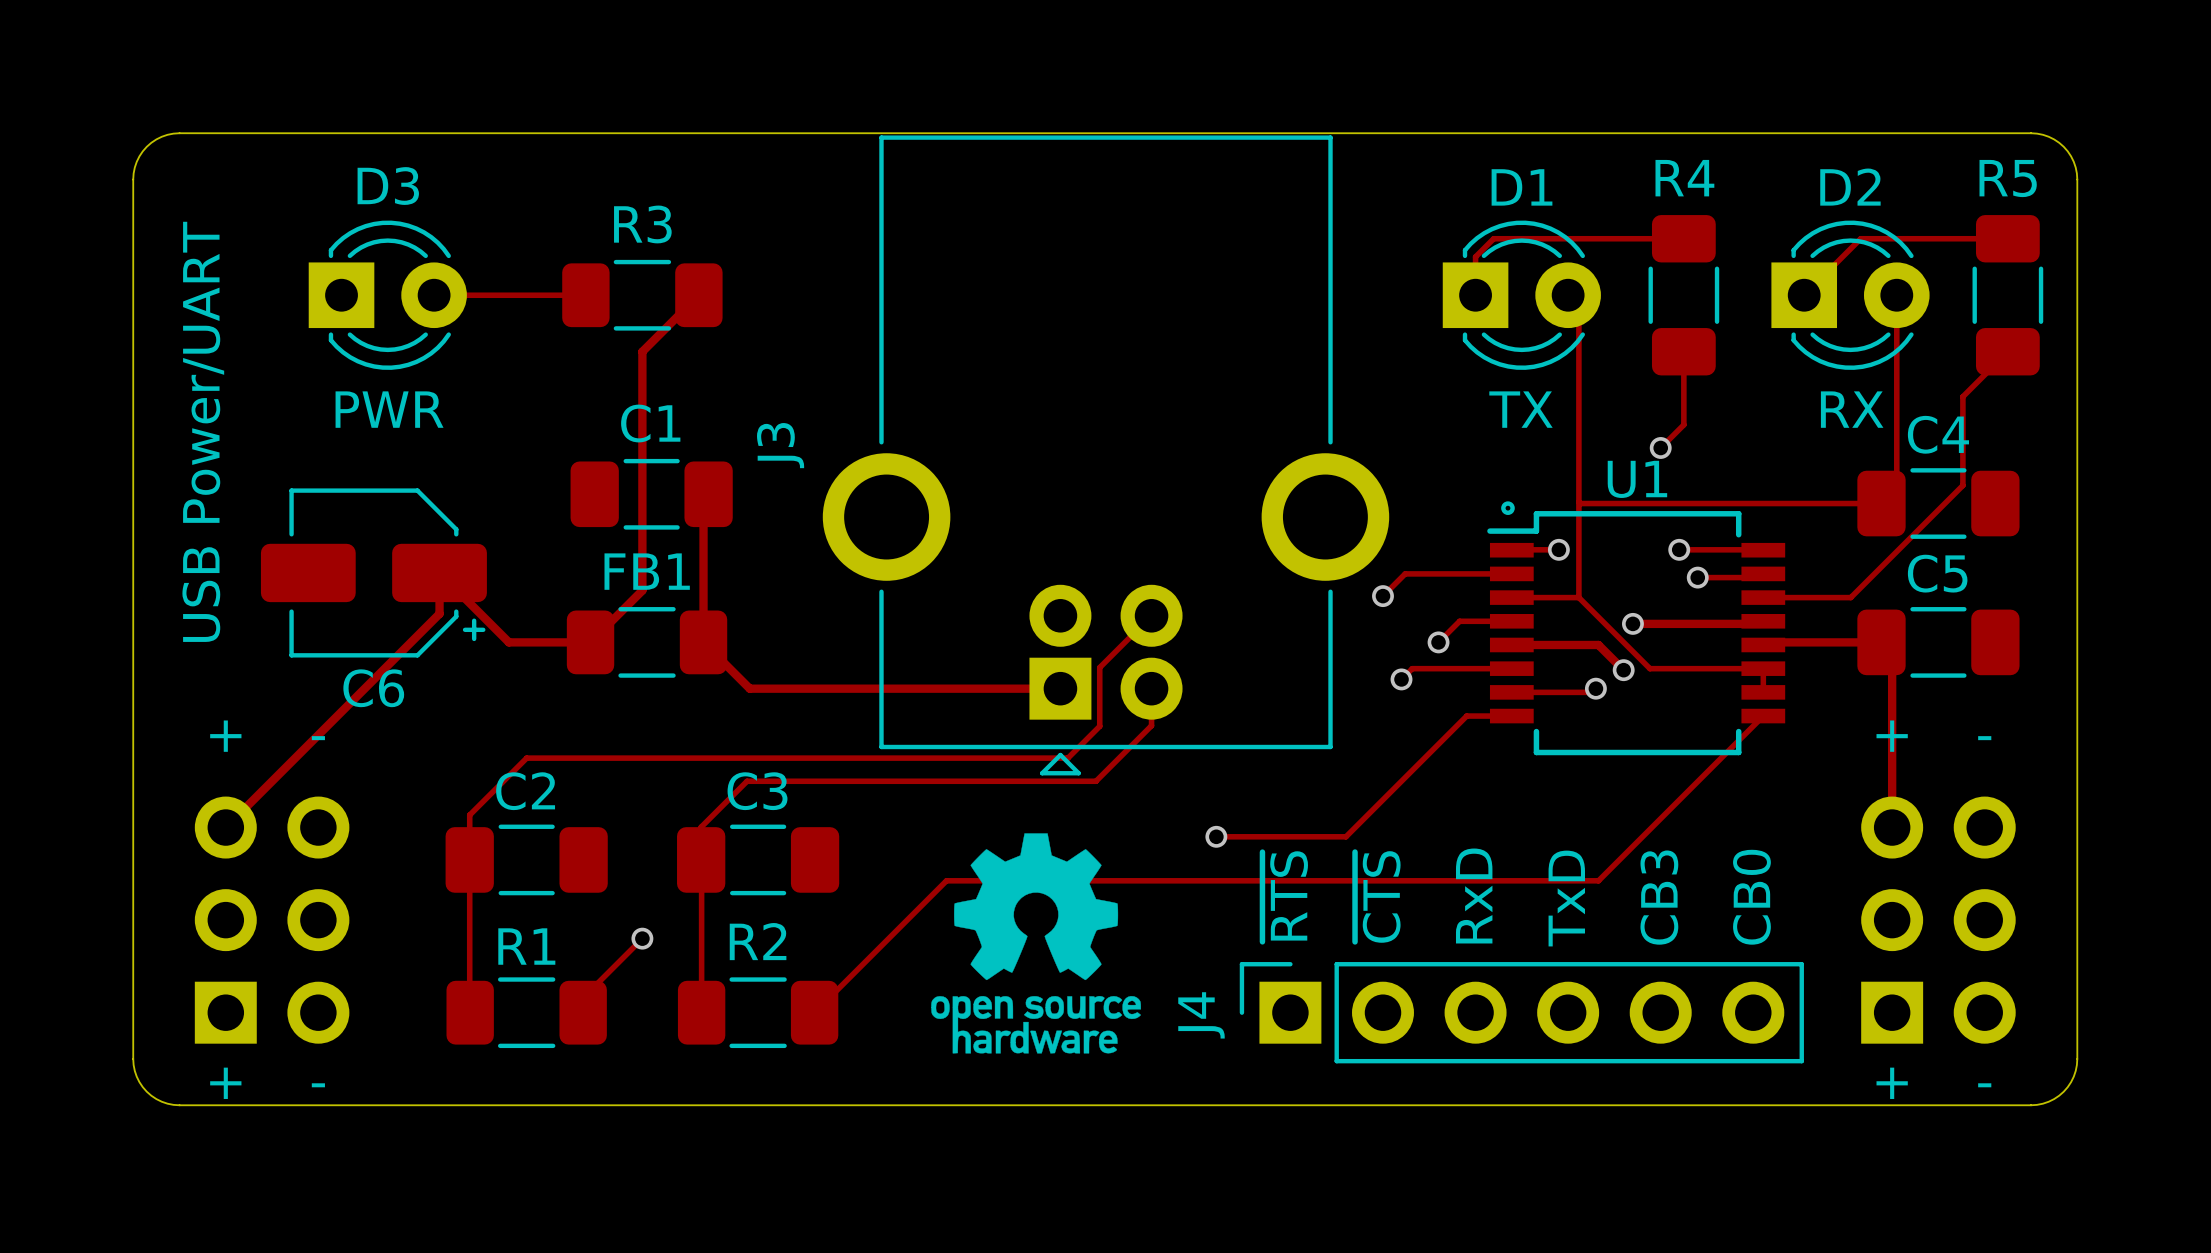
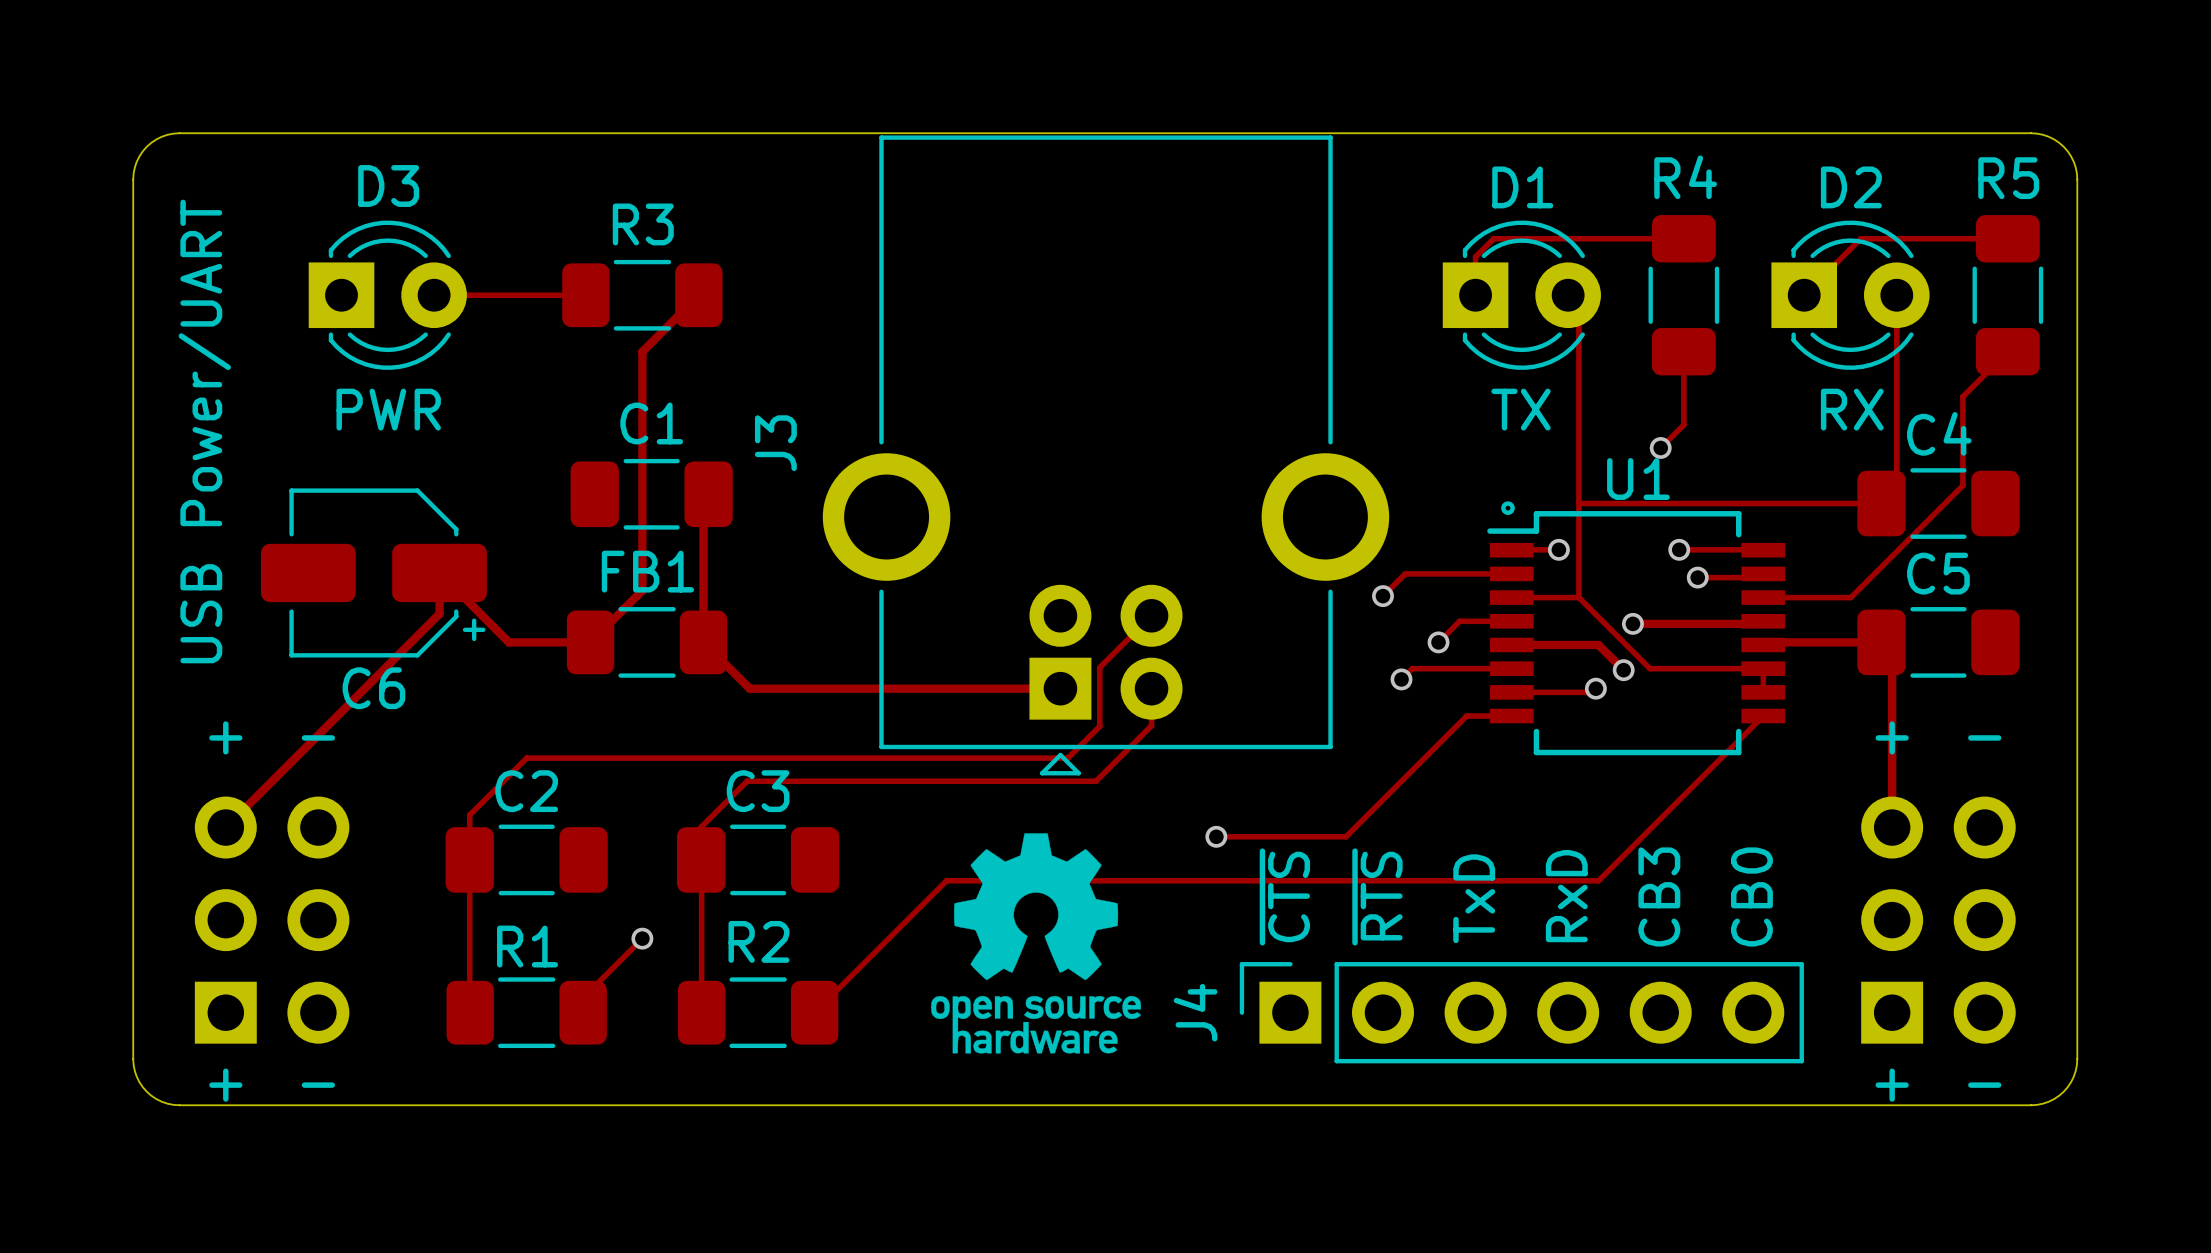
text: ~{RTS} (1285, 896) -> ~{CTS} (1284, 896)
text: ~{CTS} (1377, 896) -> ~{RTS} (1377, 896)
text: RxD (1474, 896) -> TxD (1474, 898)
text: TxD (1566, 898) -> RxD (1566, 896)

